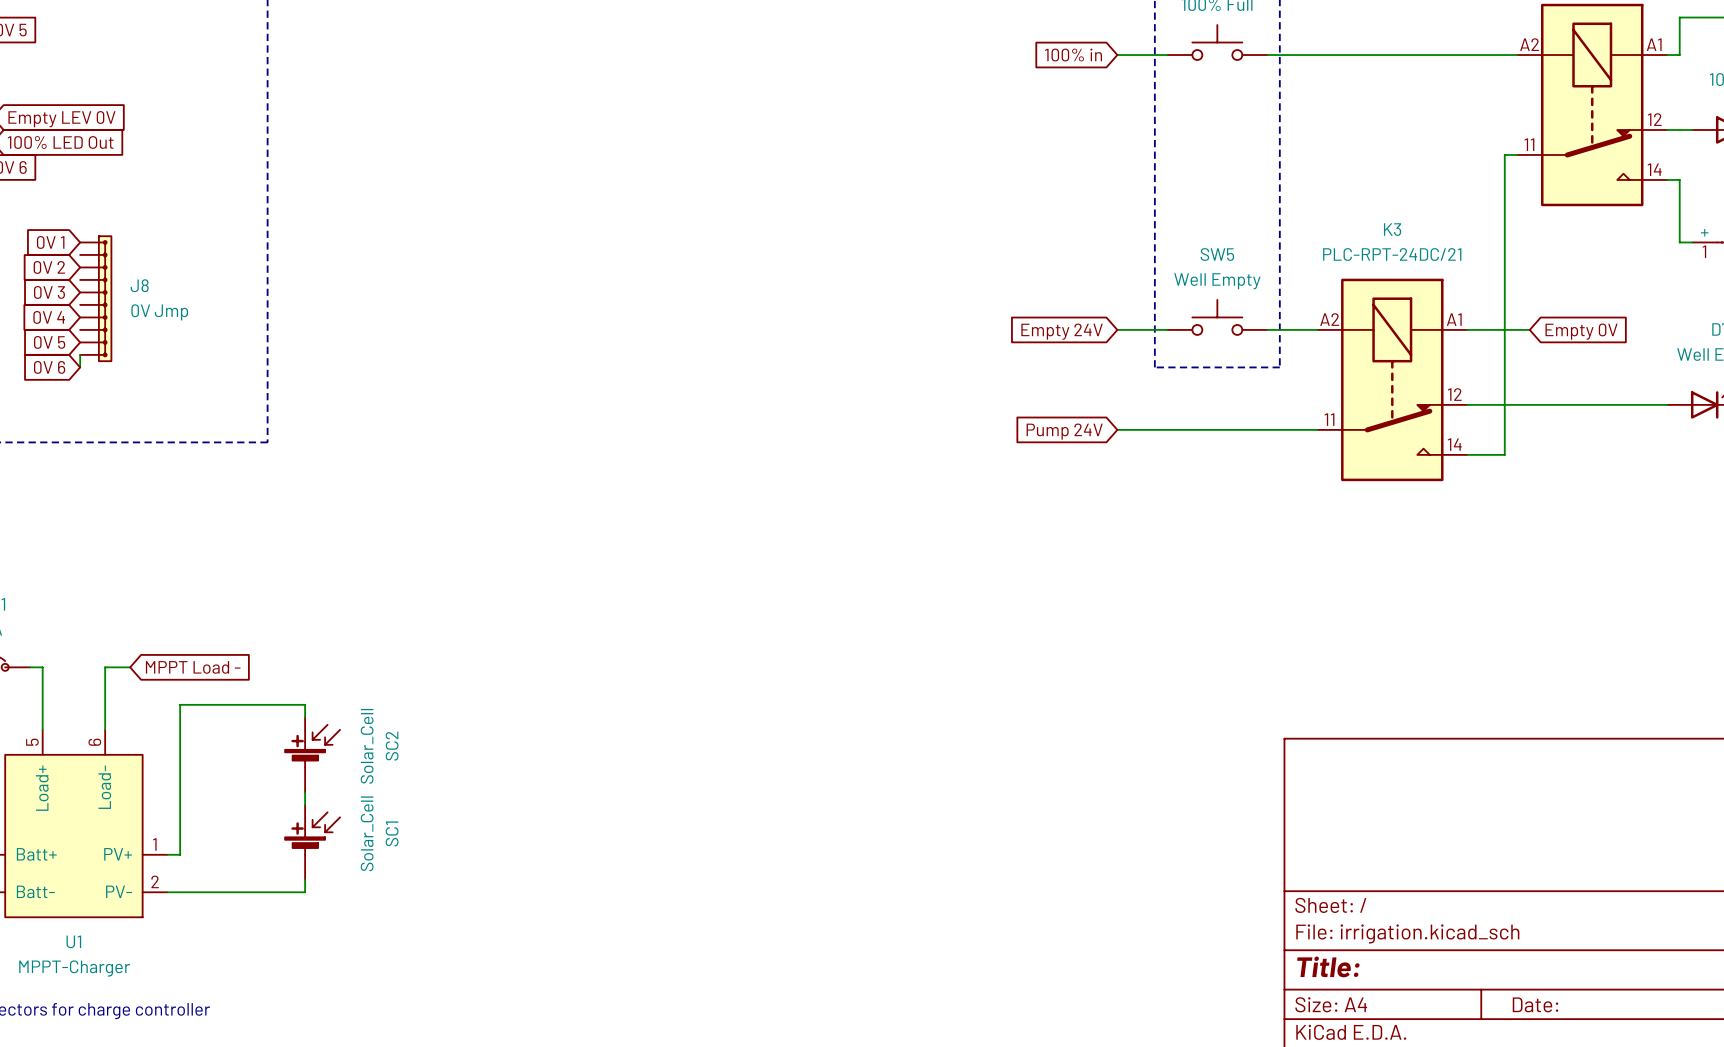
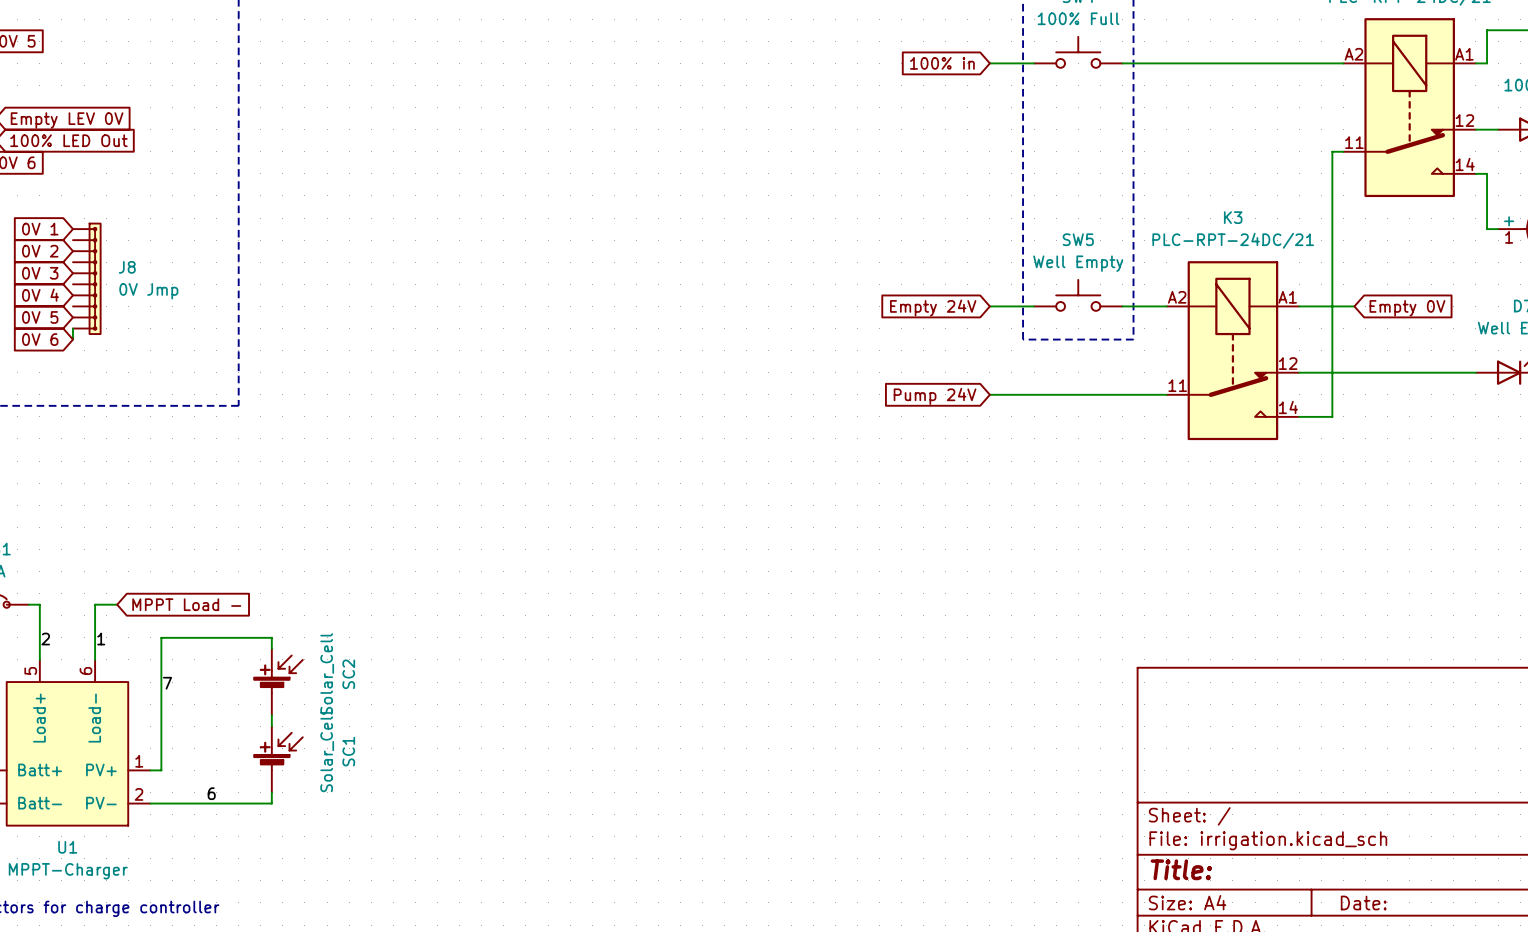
label: none -> 2 (45, 639)
label: none -> 1 (101, 639)
label: none -> 7 (167, 683)
label: none -> 6 (211, 793)

